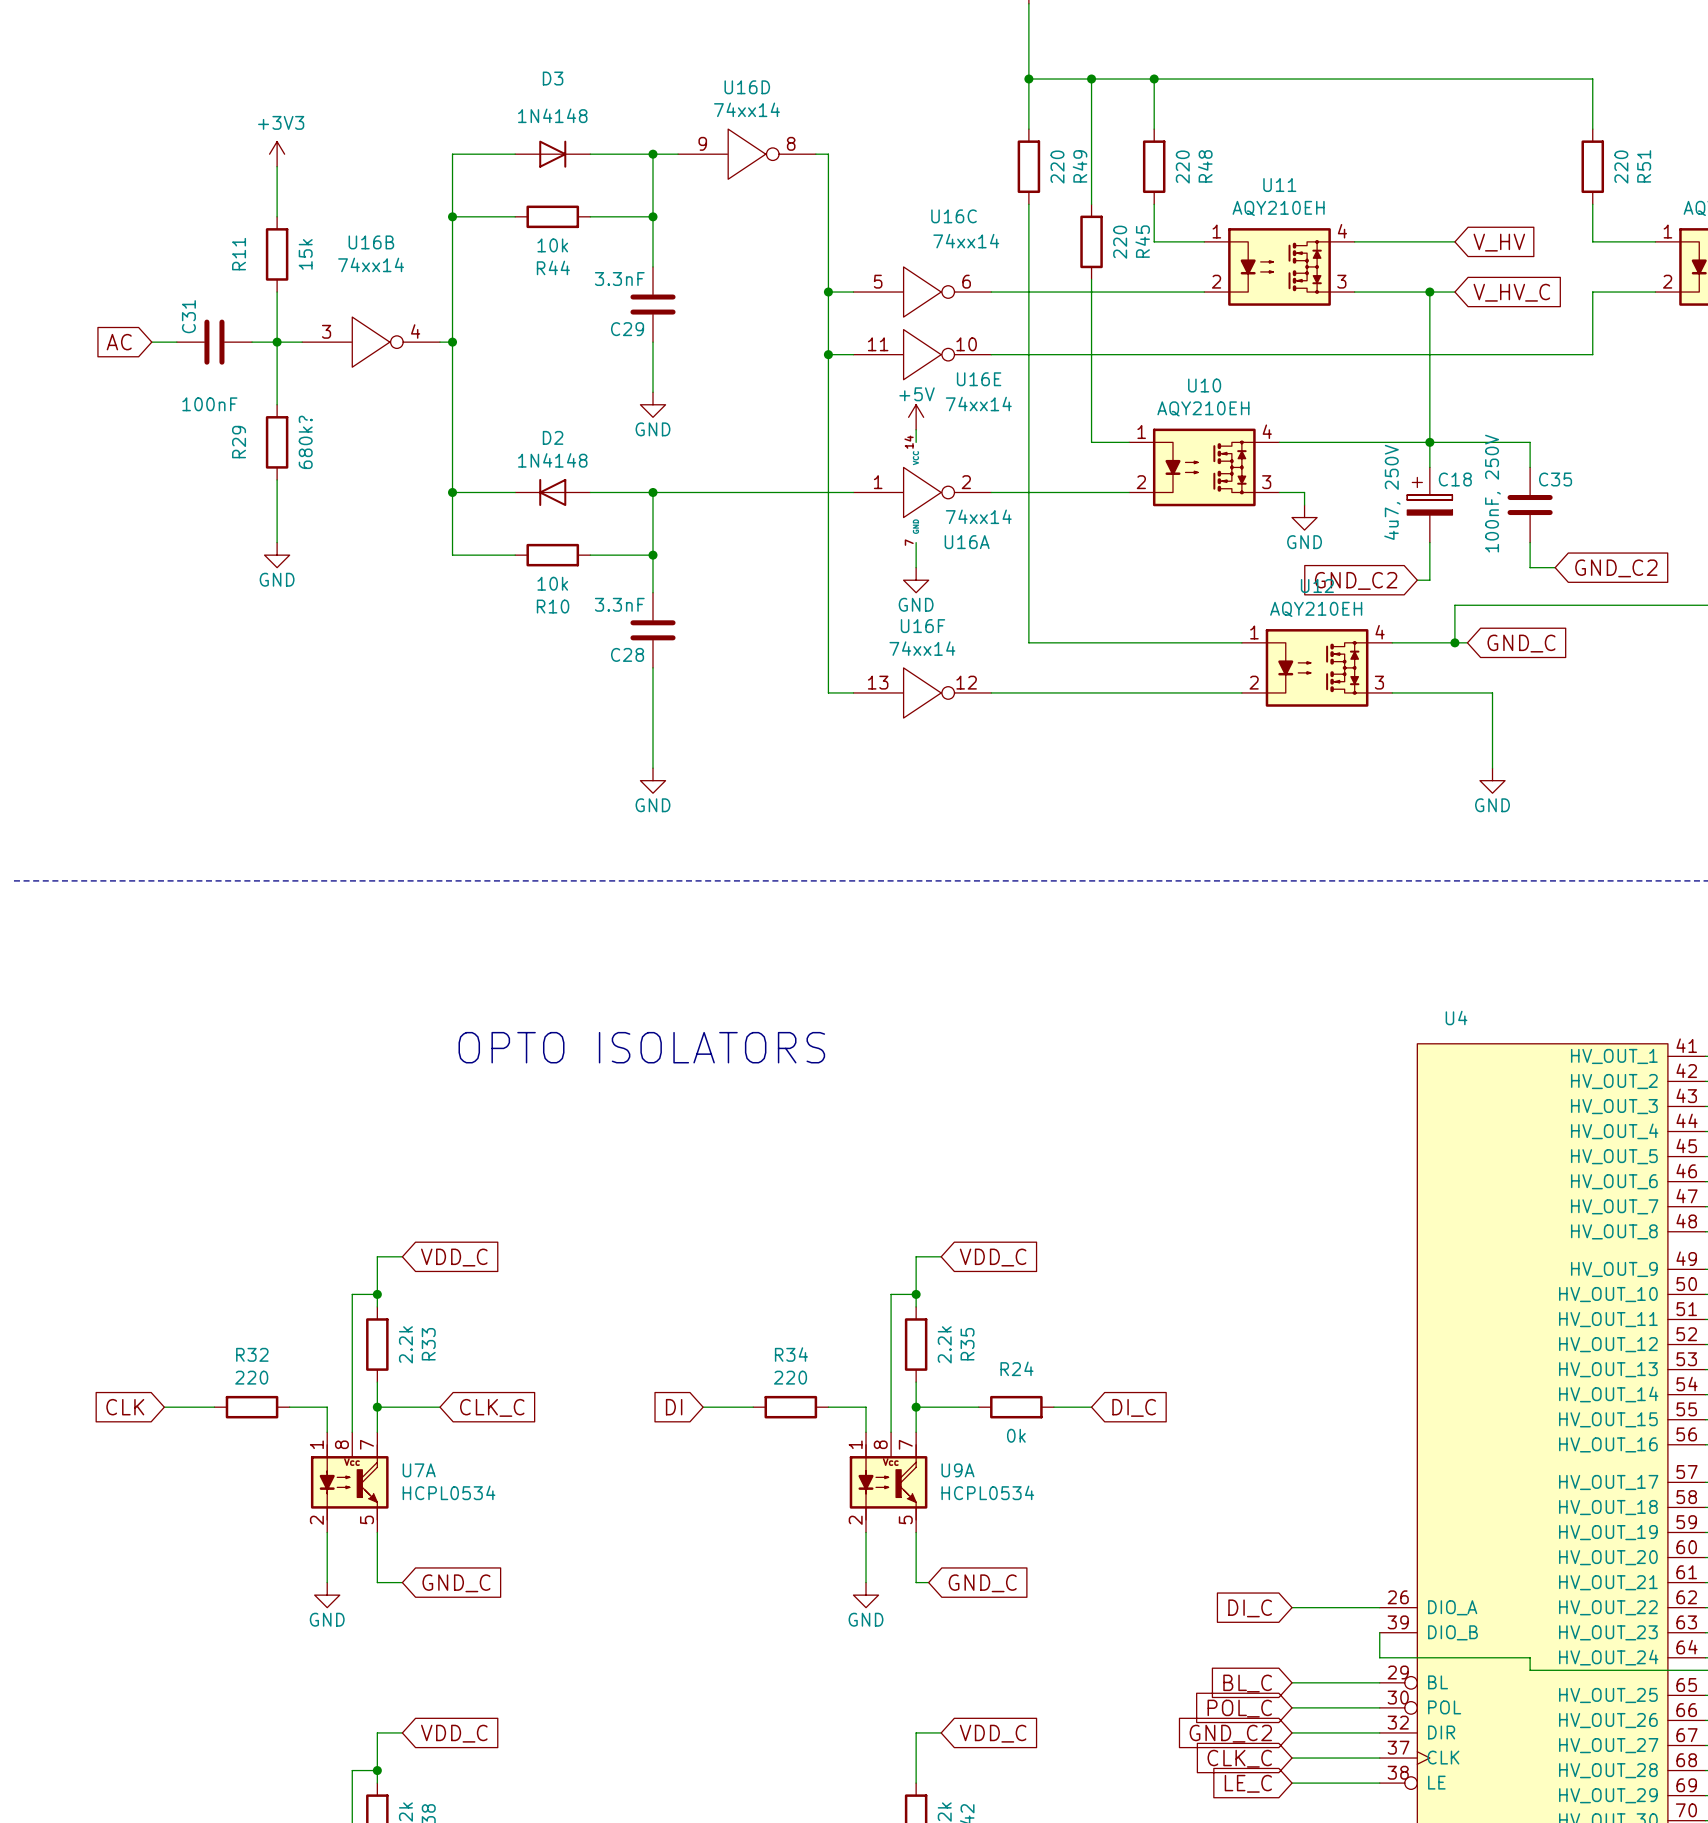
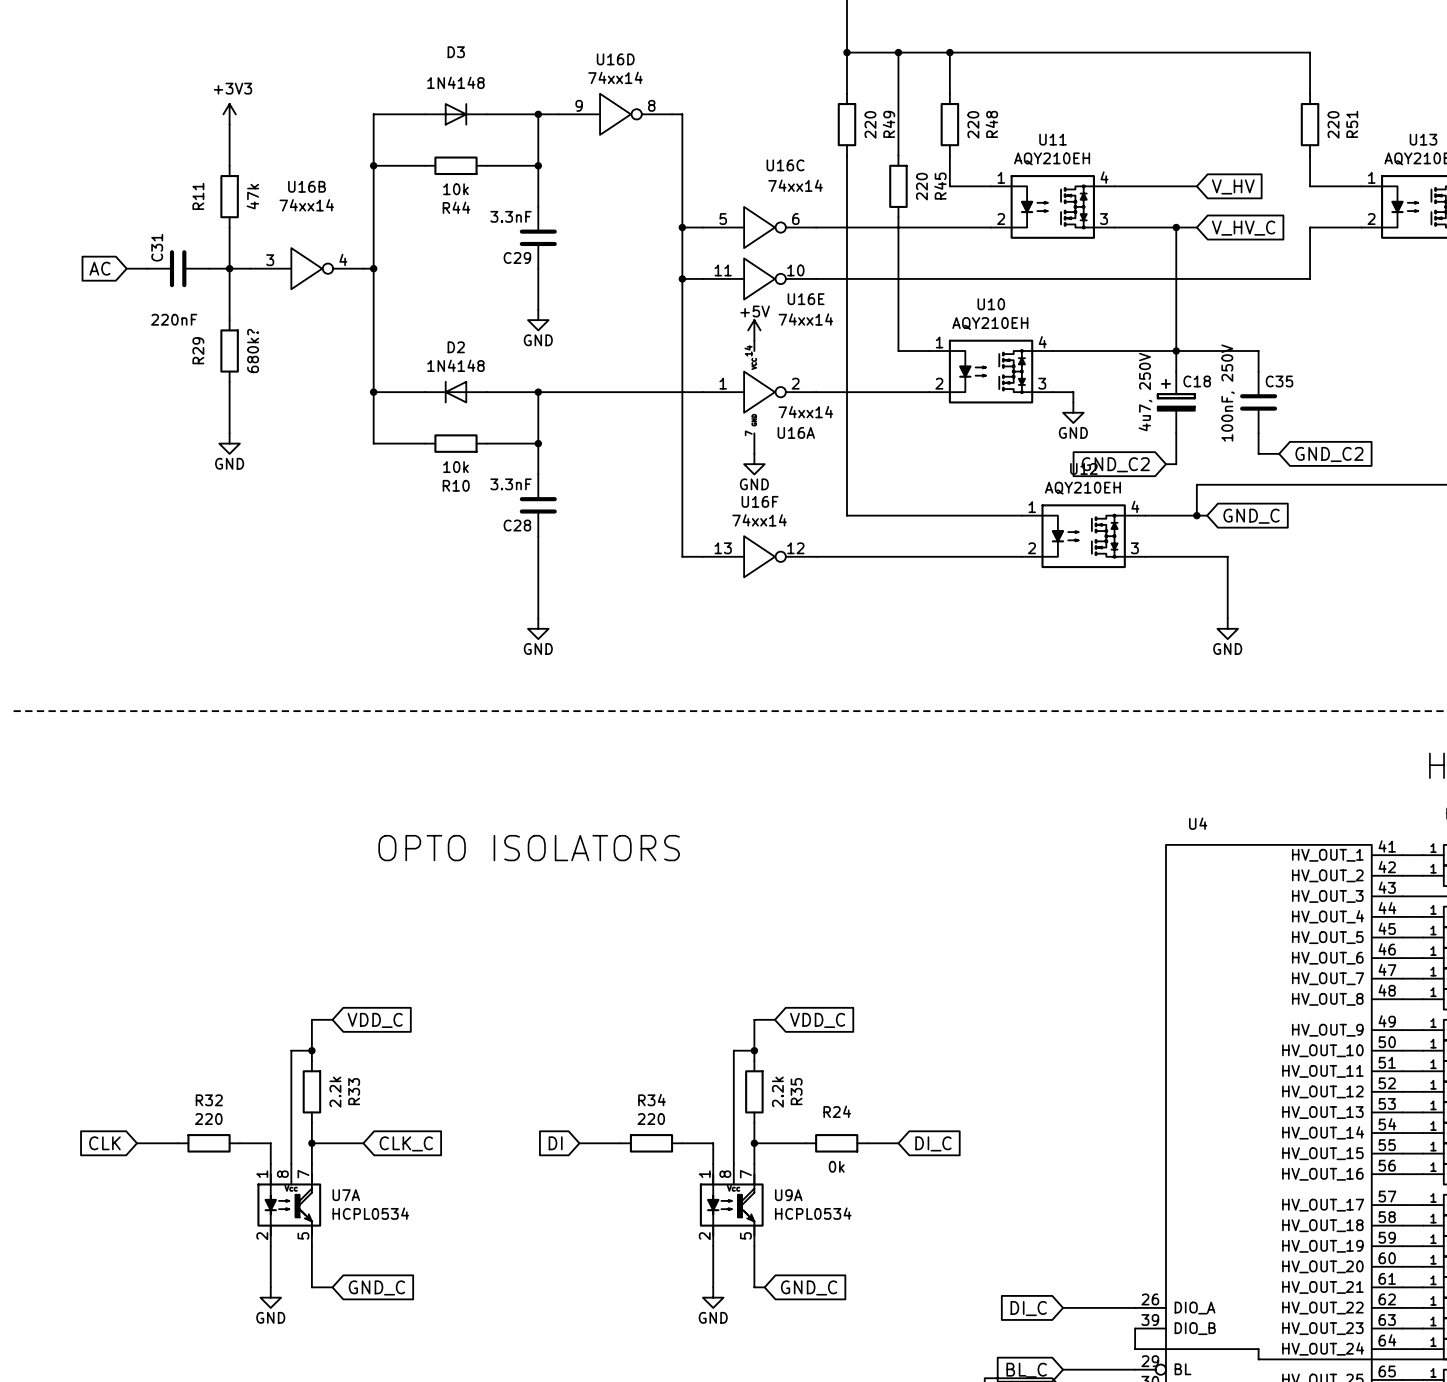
R11 value: 15k (305, 254) -> 47k (252, 196)
C31 value: 100nF (209, 404) -> 220nF (174, 319)

